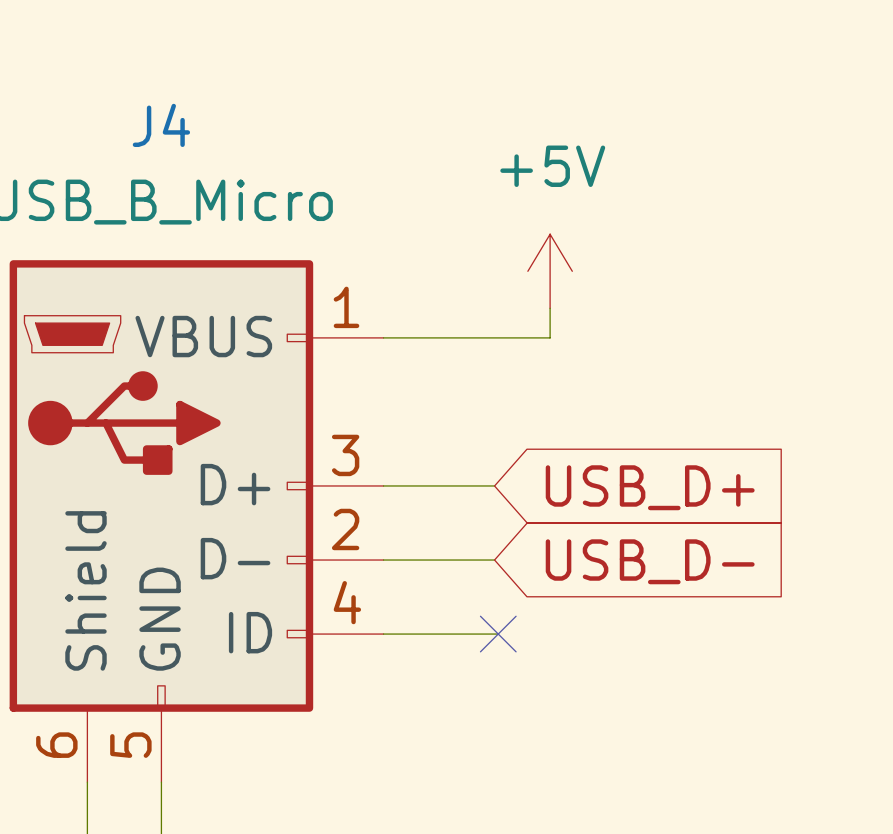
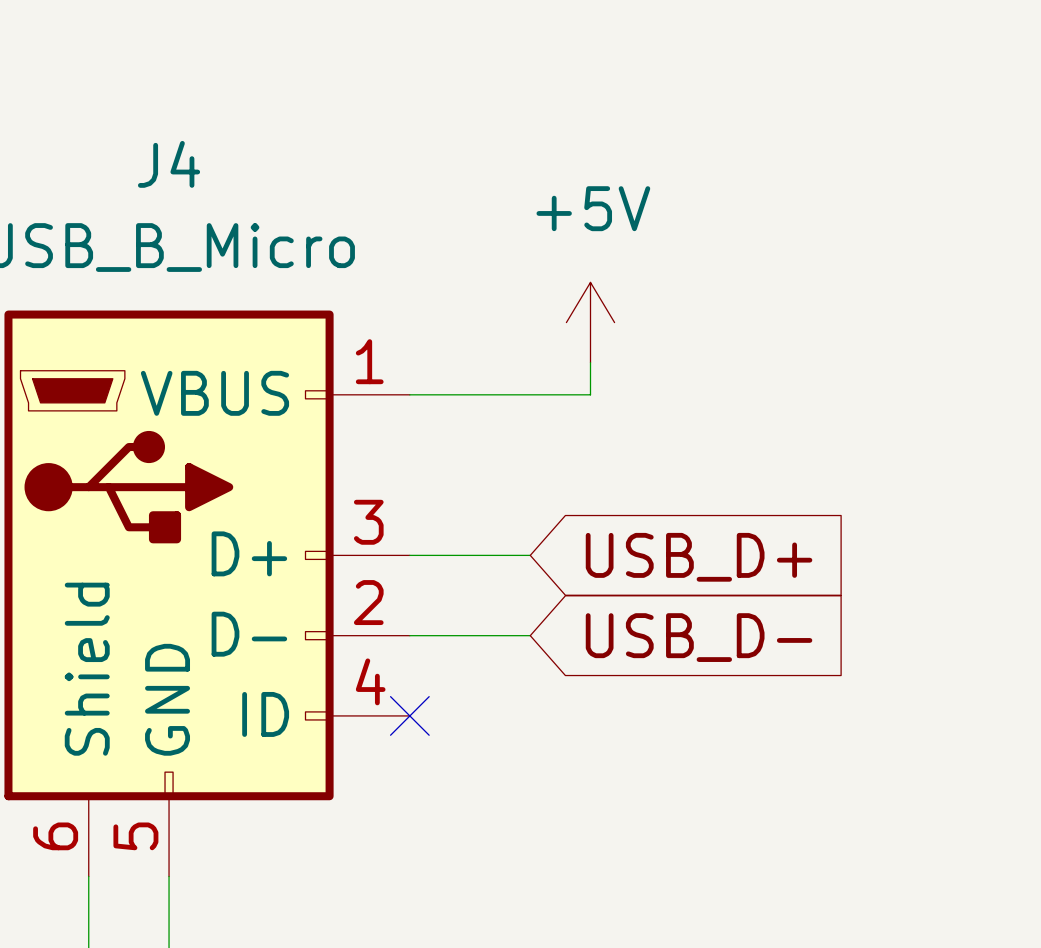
wire: (383, 634) (498, 634) -> none
no-connect mark position: (498, 634) -> (409, 715)

